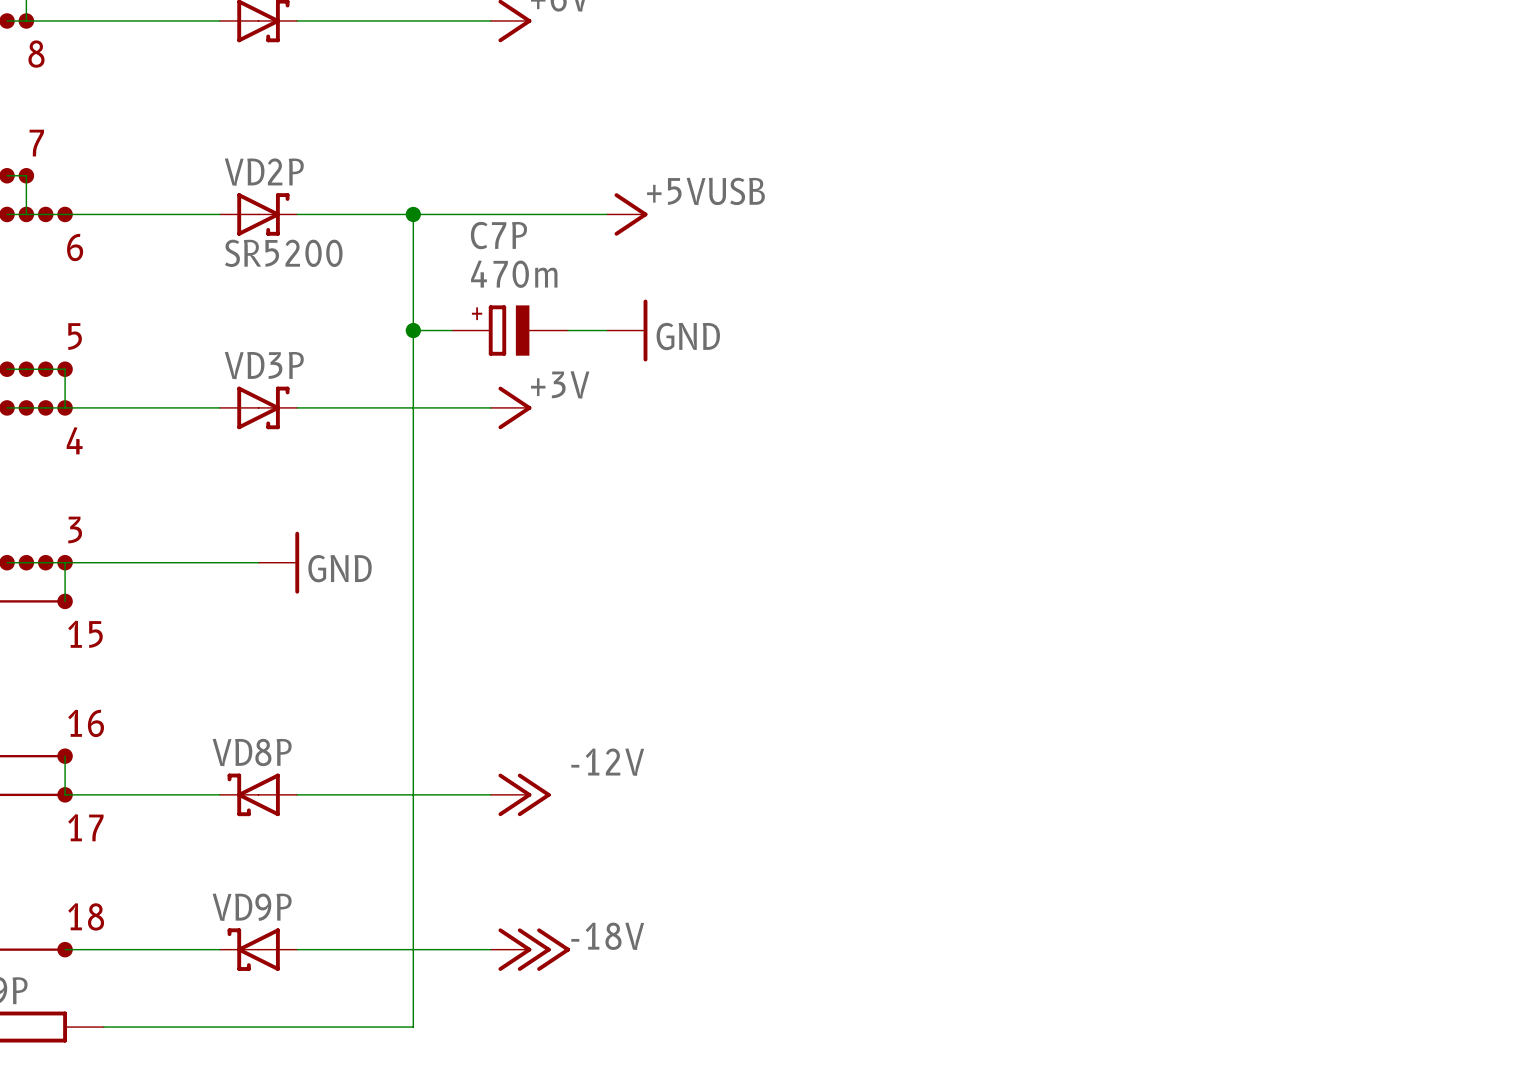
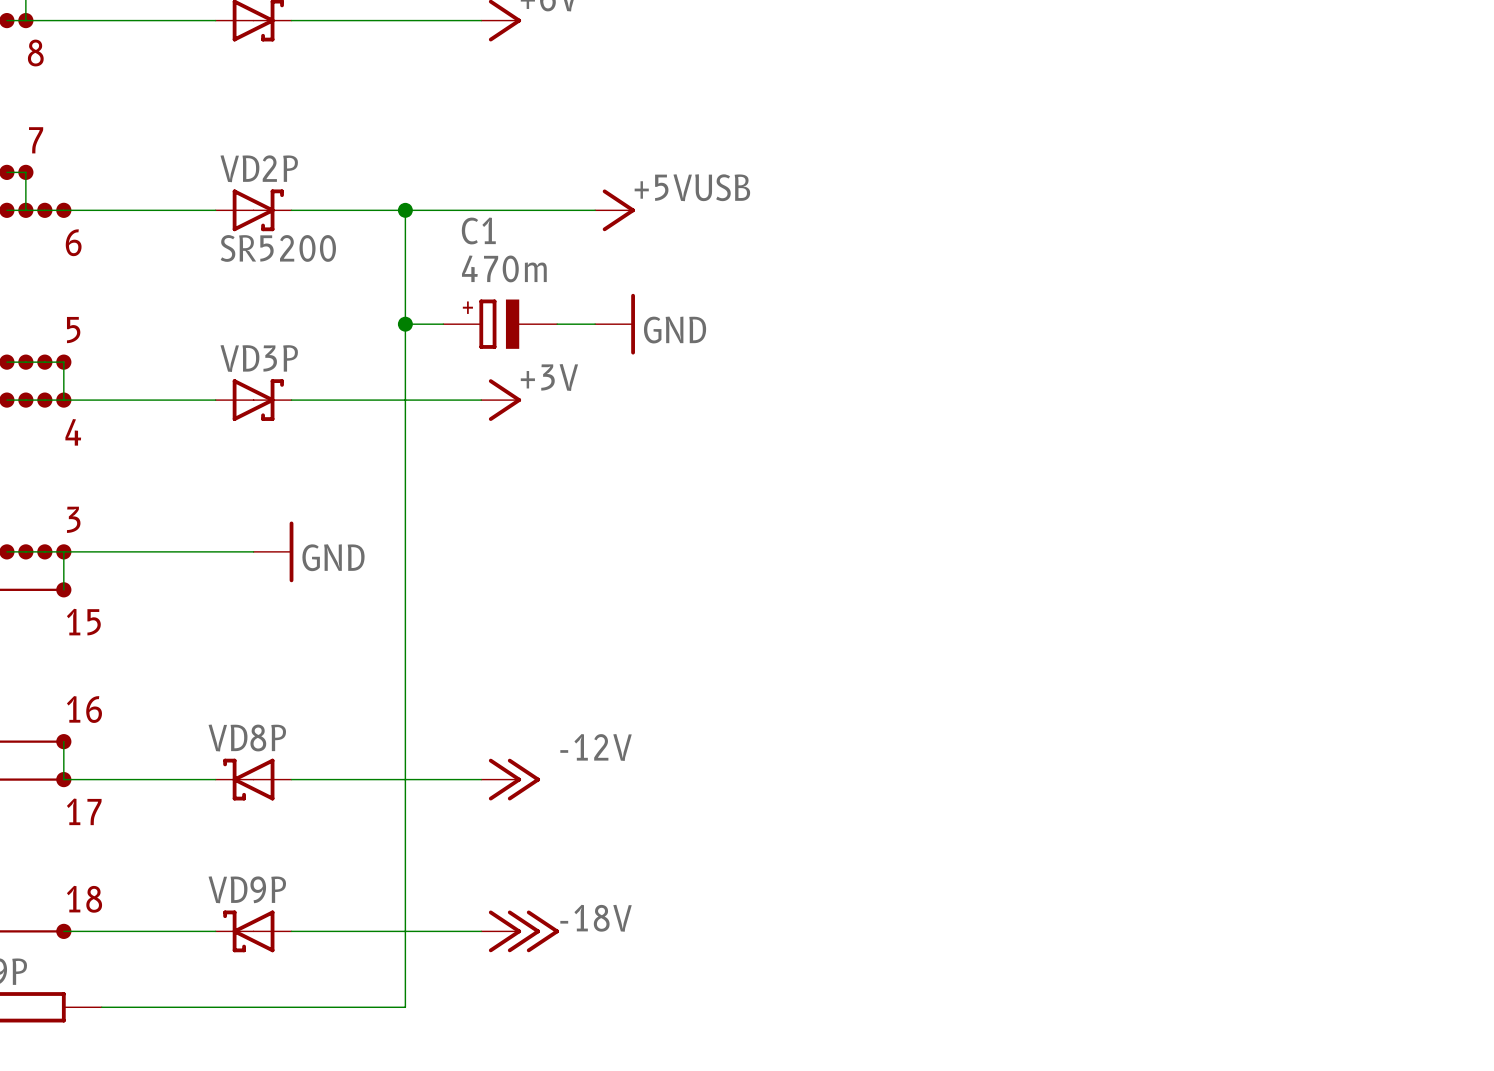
C7P name: C7P (498, 235) -> C1 (478, 230)

